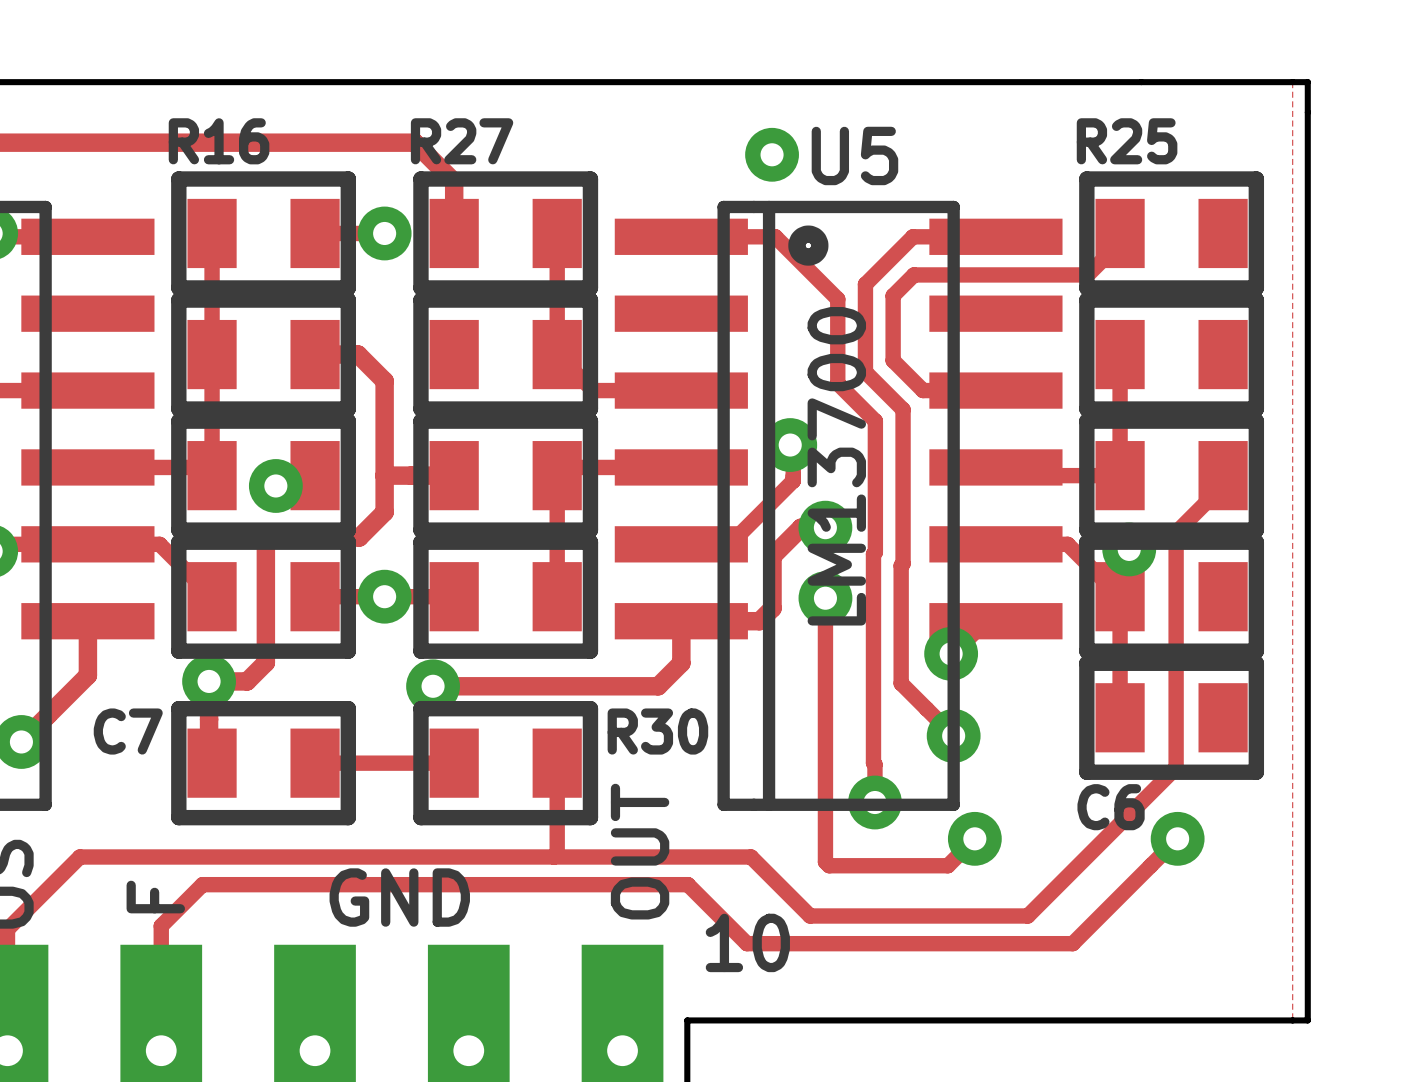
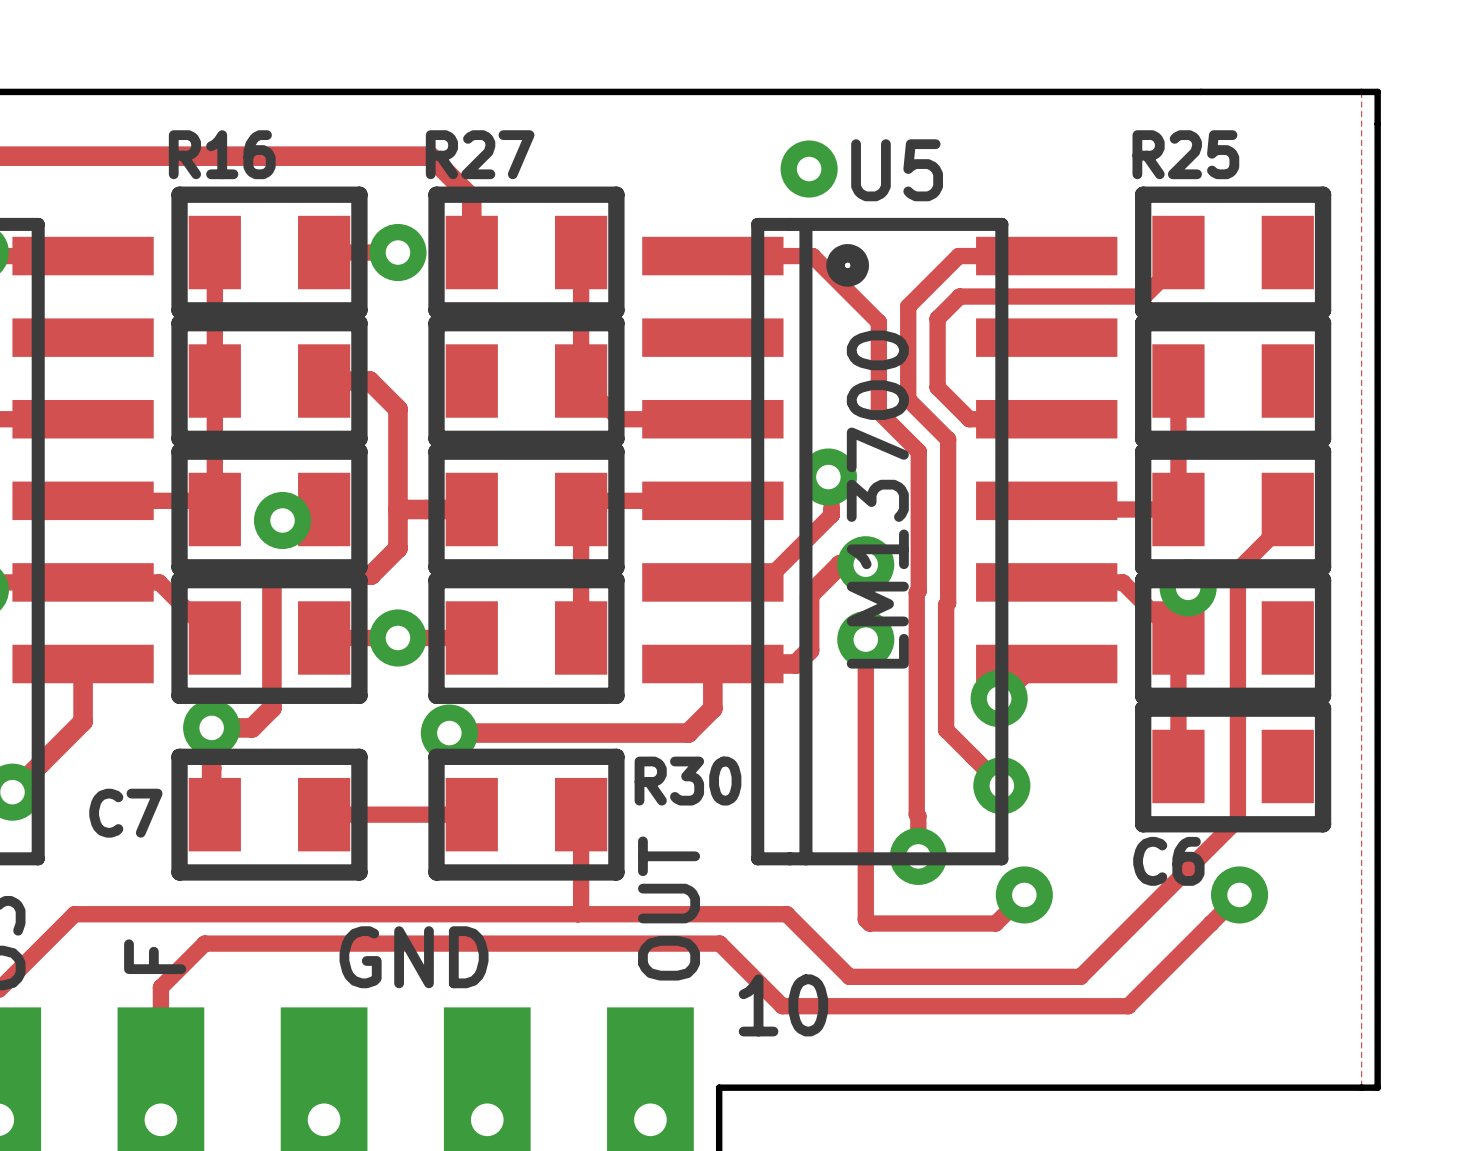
C7 name position: C7 (128, 731) -> C7 (125, 813)

